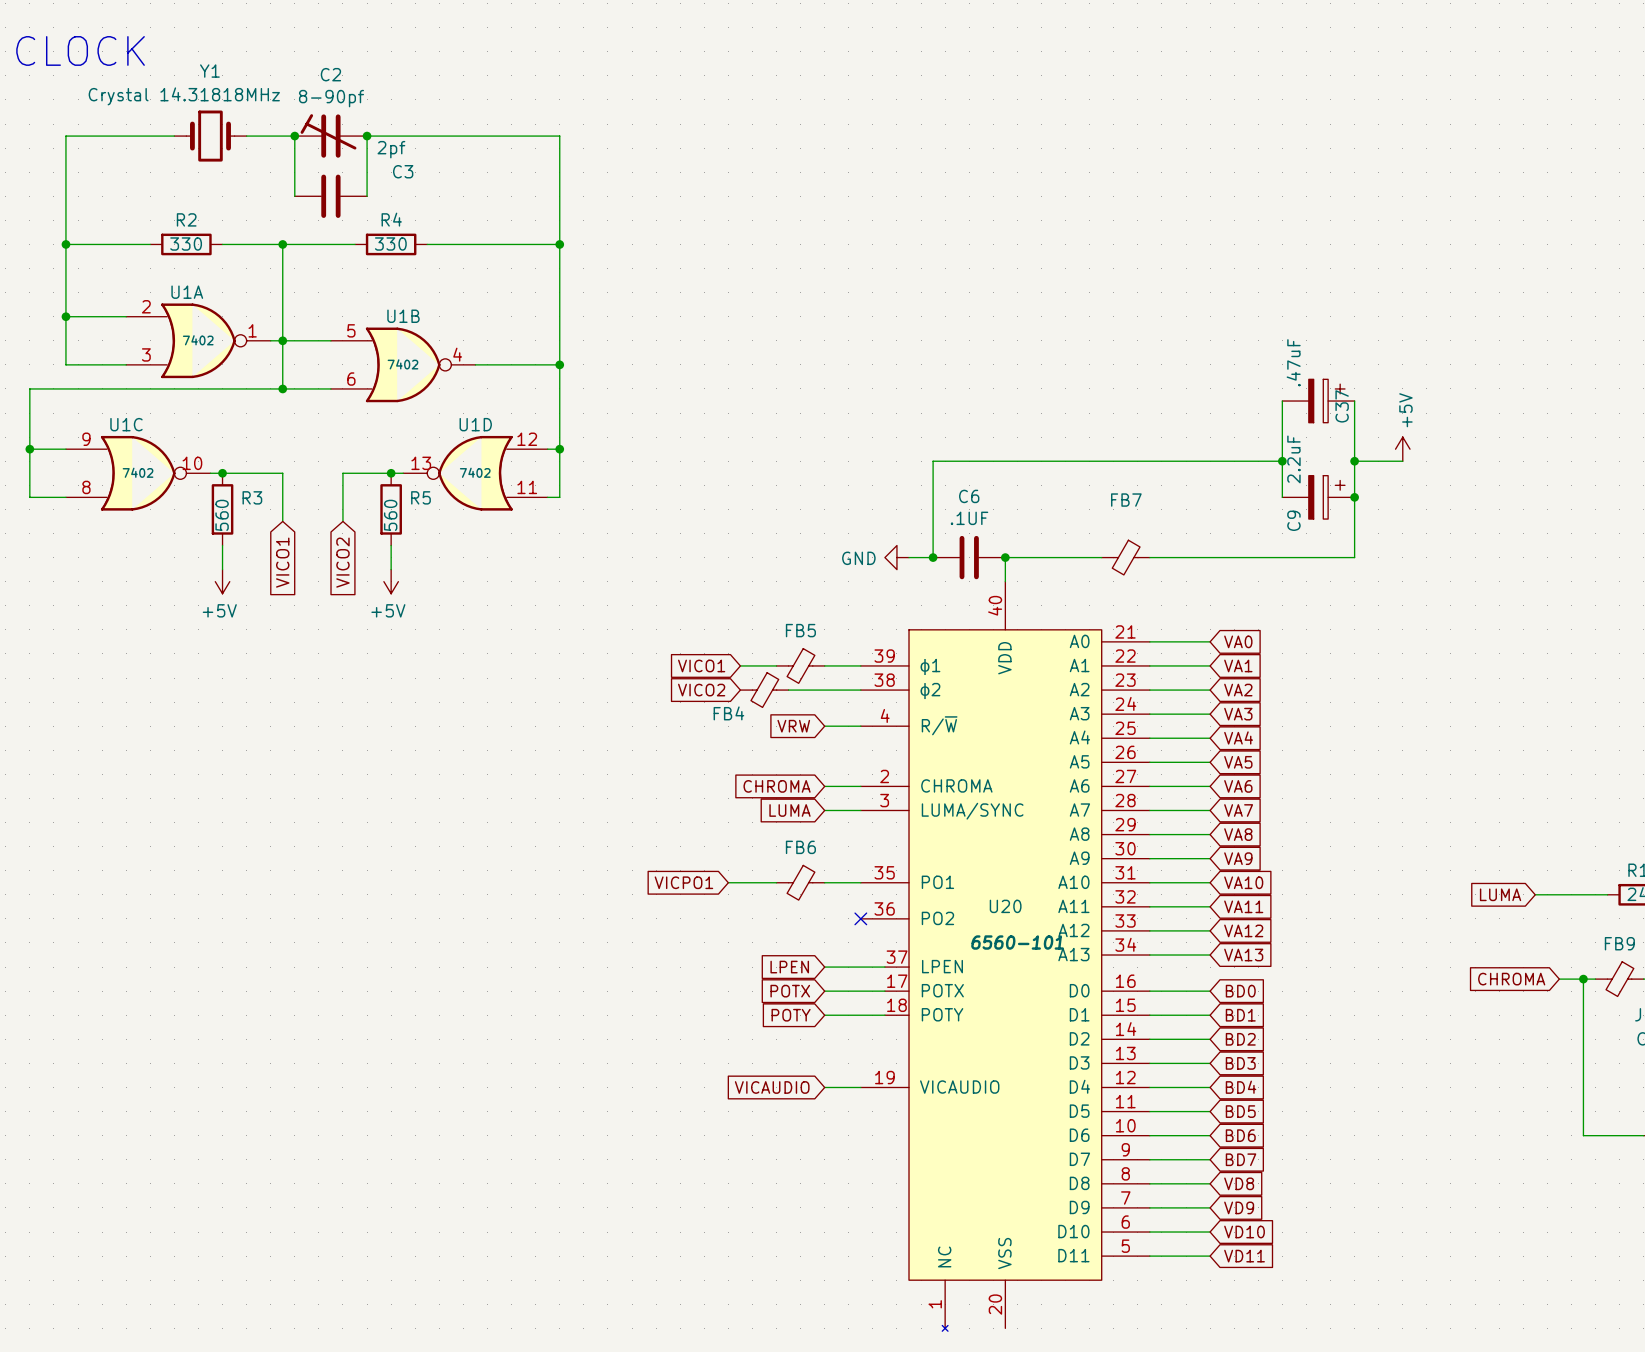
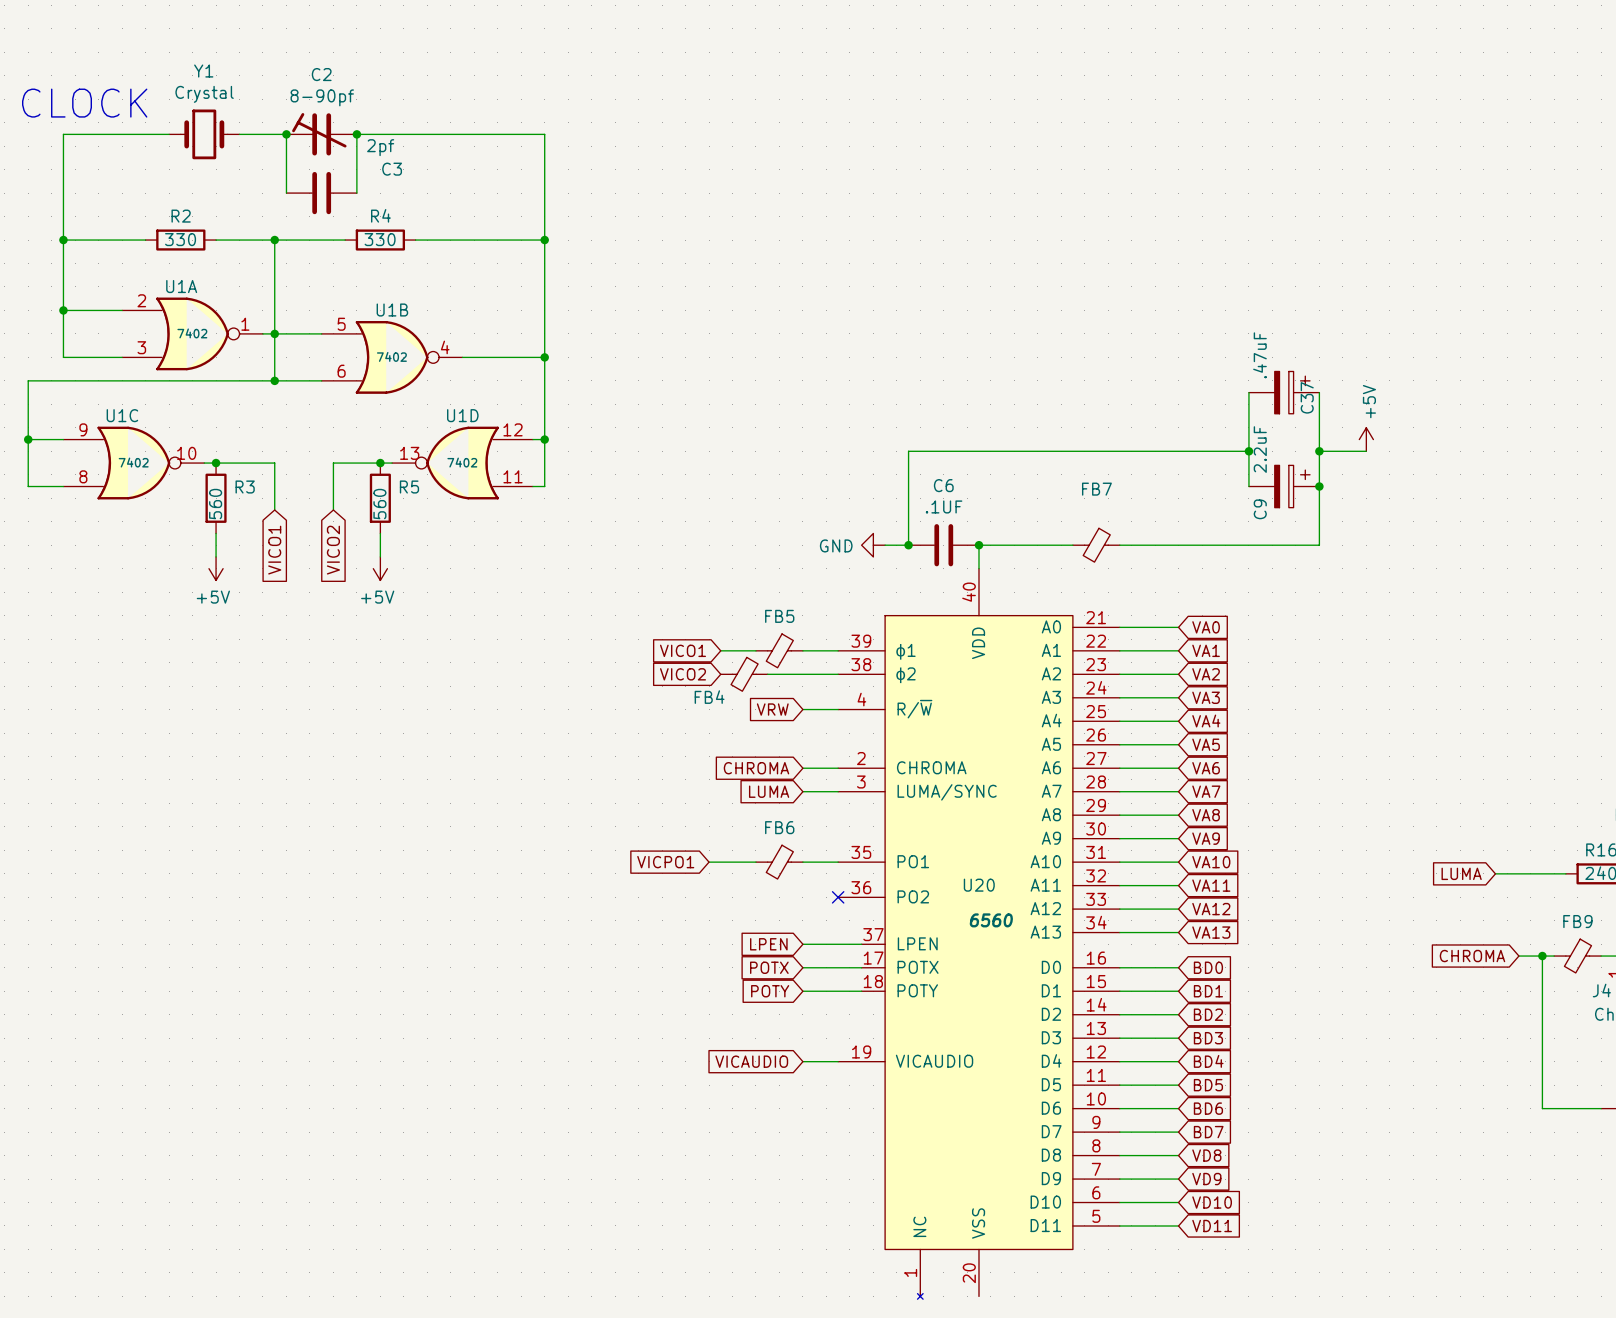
text position: CLOCK (80, 50) -> CLOCK (84, 103)
Y1 value: Crystal 14.31818MHz (184, 96) -> Crystal (204, 94)
U20 value: 6560-101 (1017, 942) -> 6560 (991, 920)

